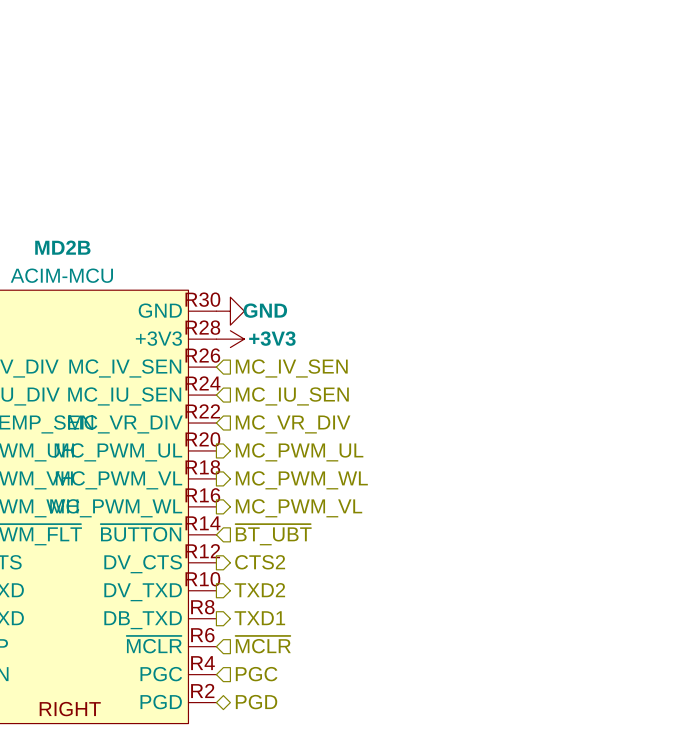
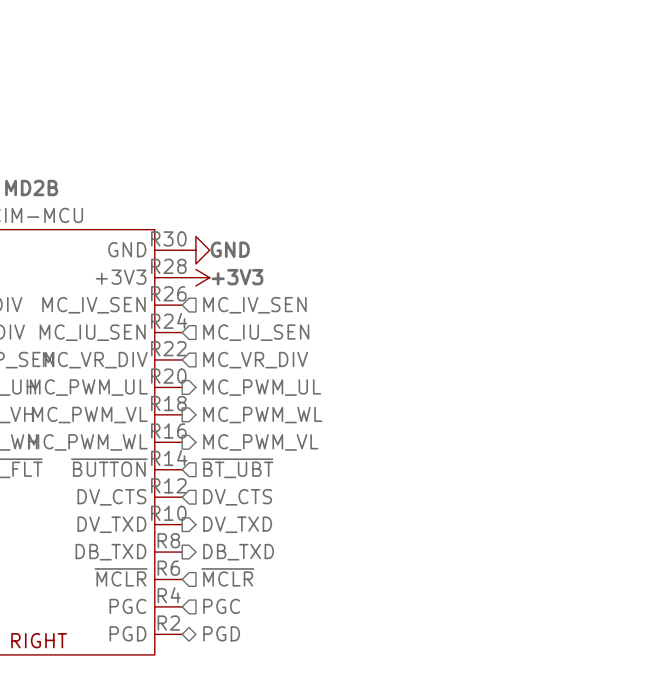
hierarchical label shape: output (260, 562) -> input (237, 497)
hierarchical label: CTS2 (260, 562) -> DV_CTS (237, 497)
hierarchical label: TXD2 (259, 590) -> DV_TXD (237, 524)
hierarchical label: TXD1 (259, 618) -> DB_TXD (238, 552)

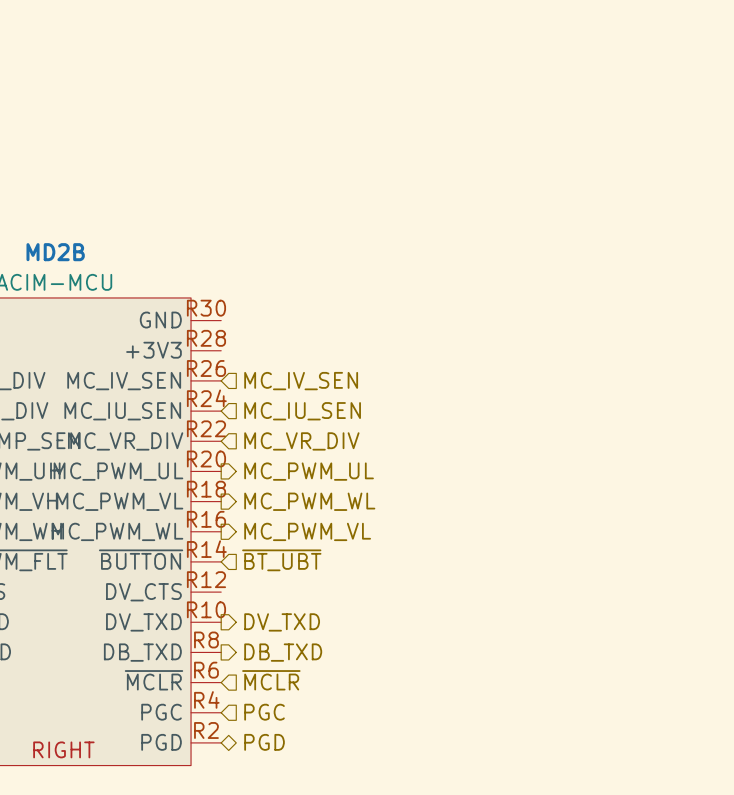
power symbol: GND (195, 250) -> none
power symbol: +3V3 (195, 277) -> none
hierarchical label: DV_CTS (237, 497) -> none

